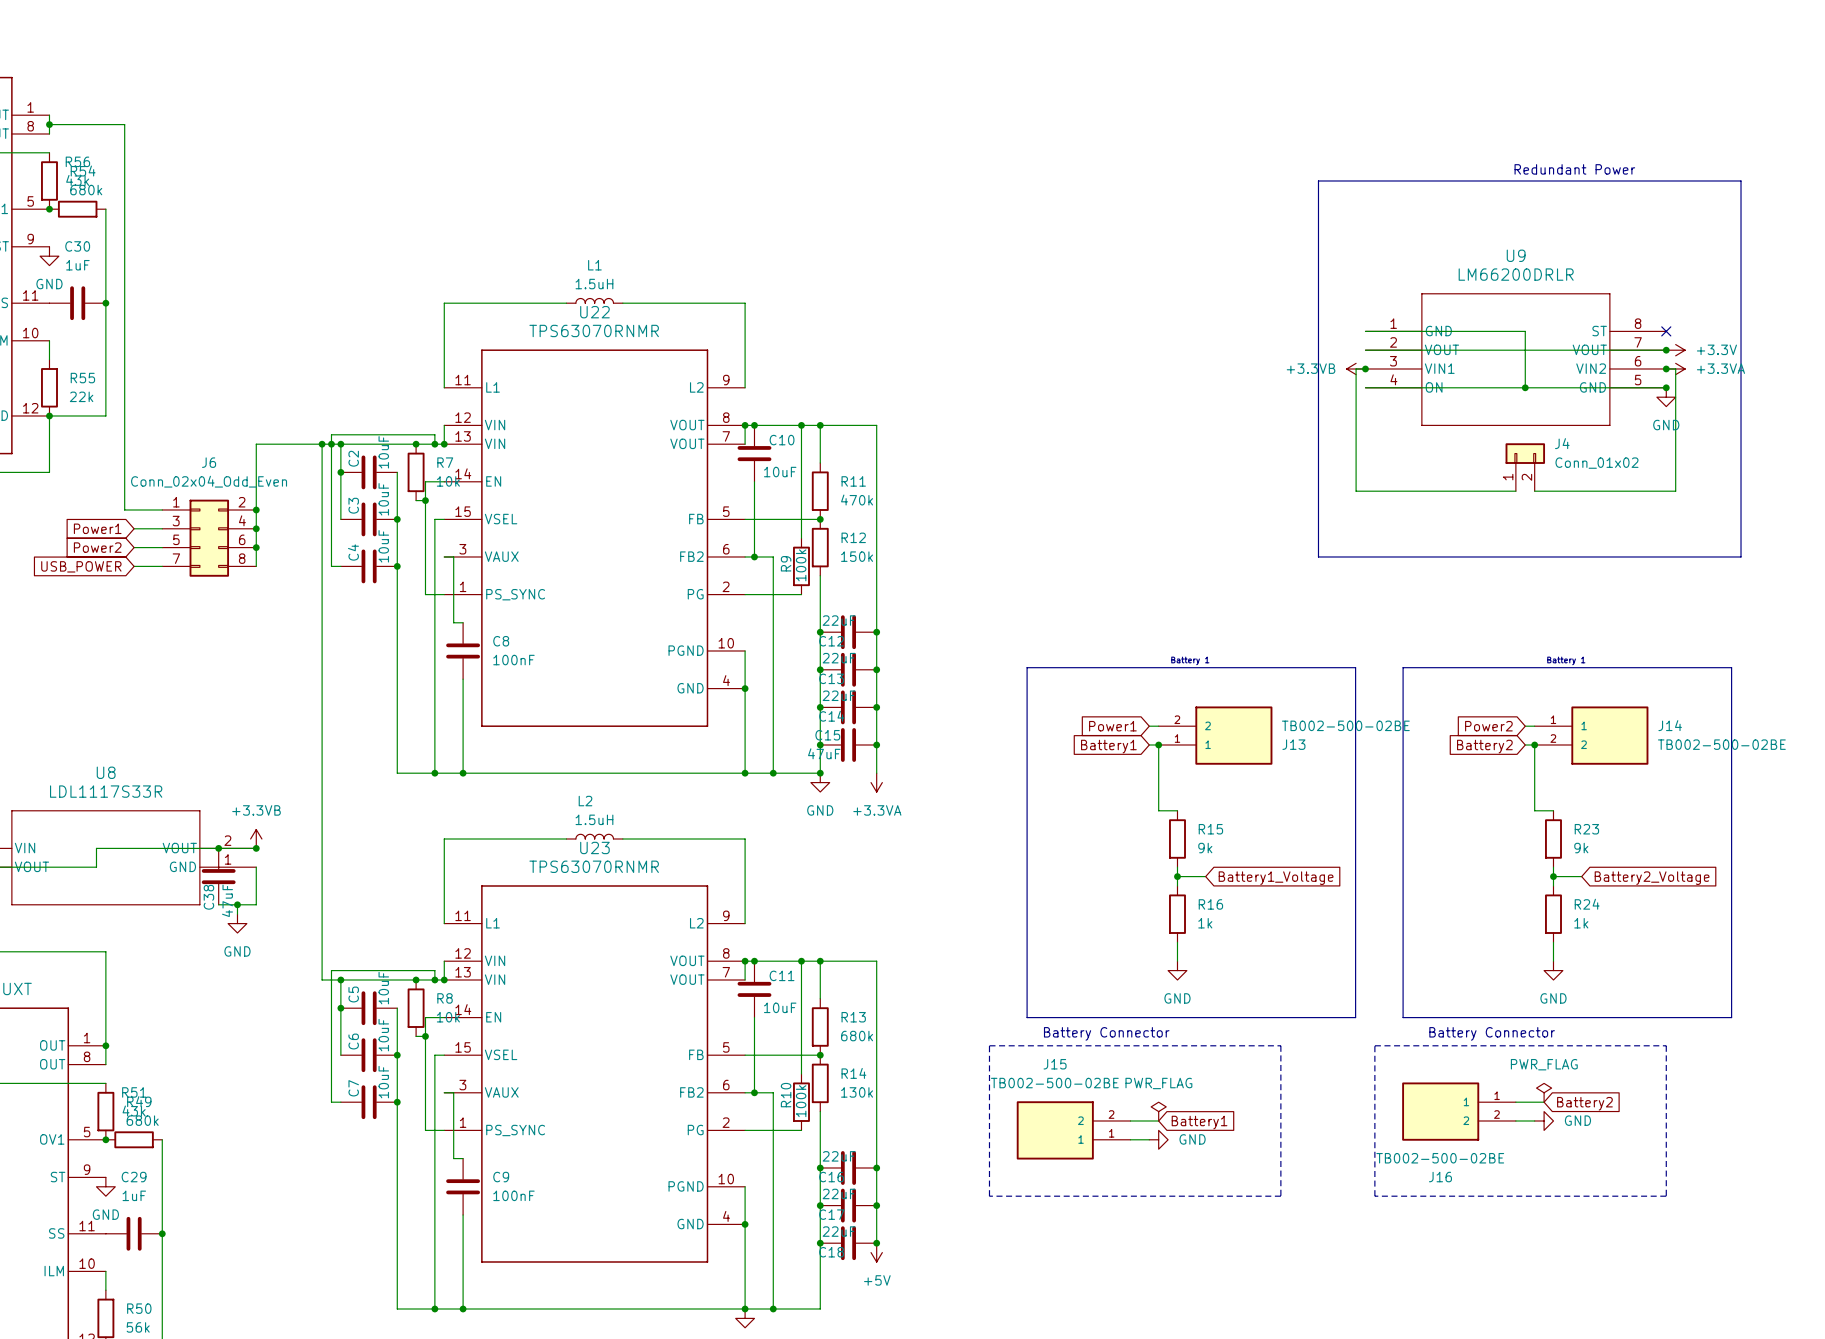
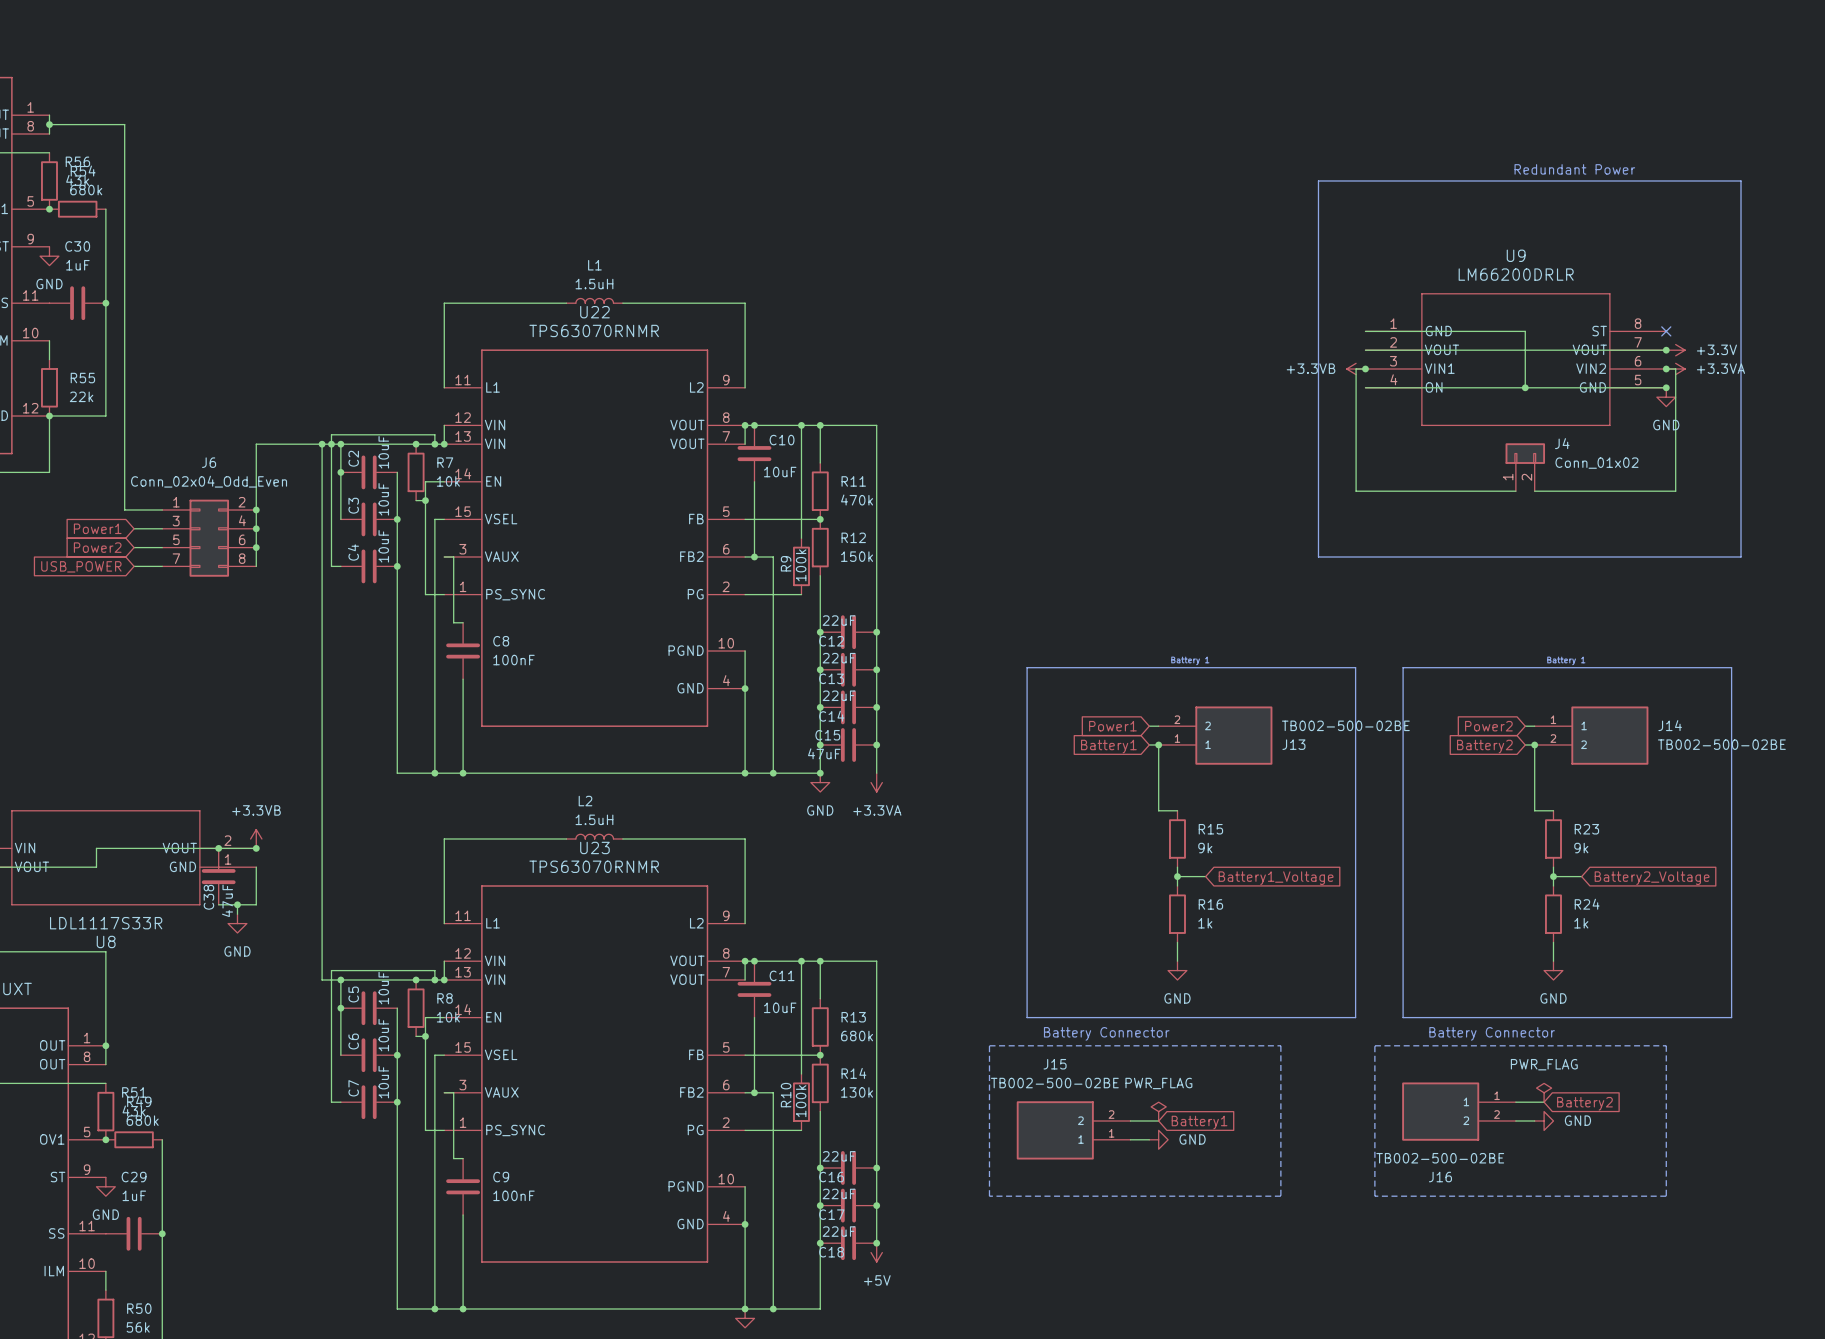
U8 name position: U8 (106, 772) -> U8 (106, 941)
U8 value position: LDL1117S33R (106, 791) -> LDL1117S33R (106, 923)

